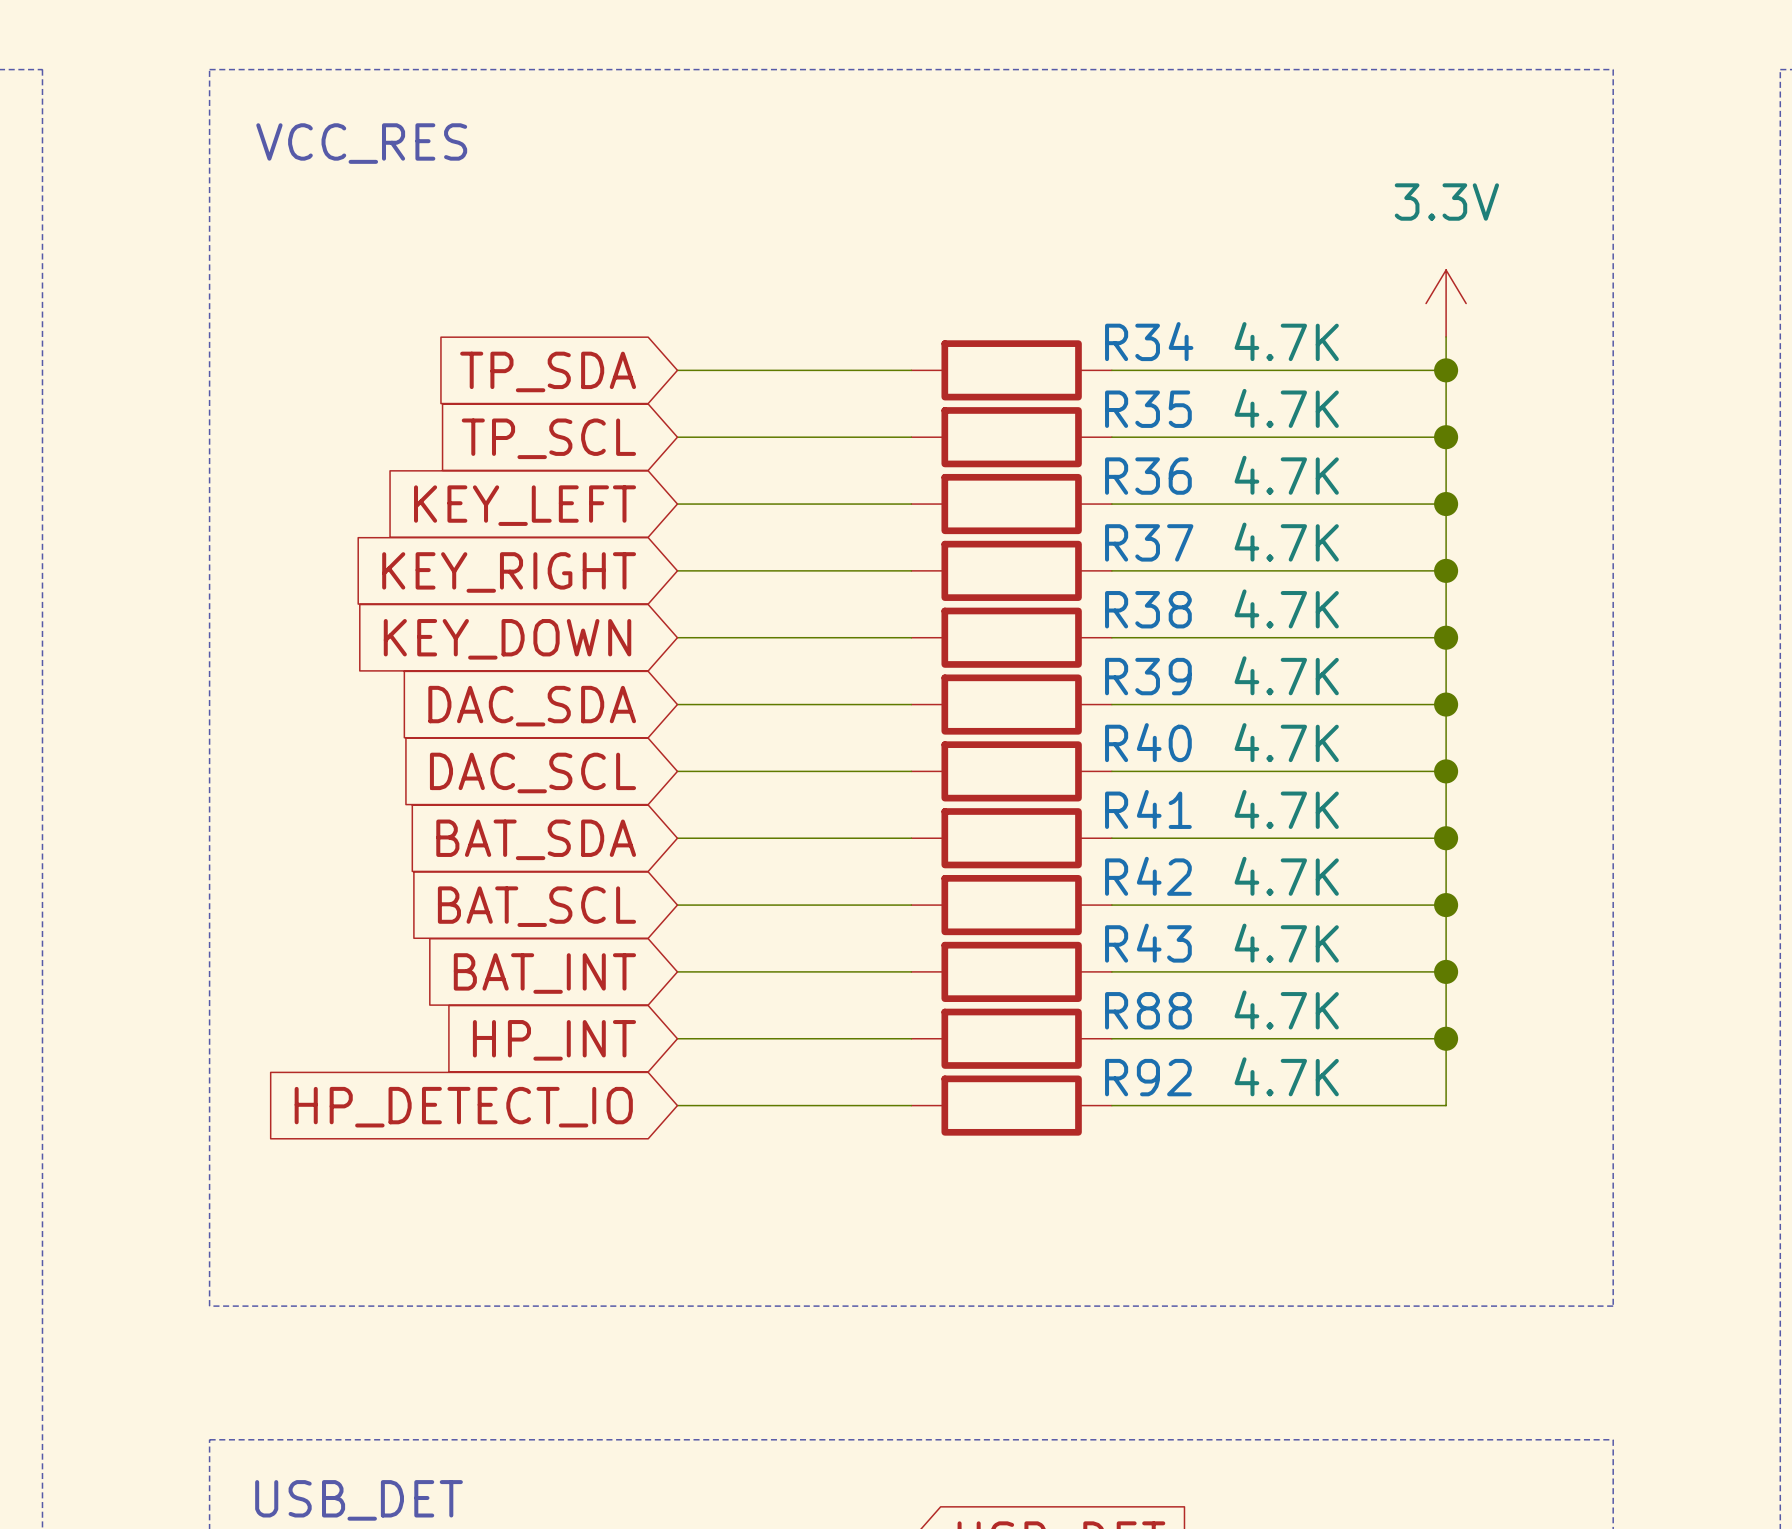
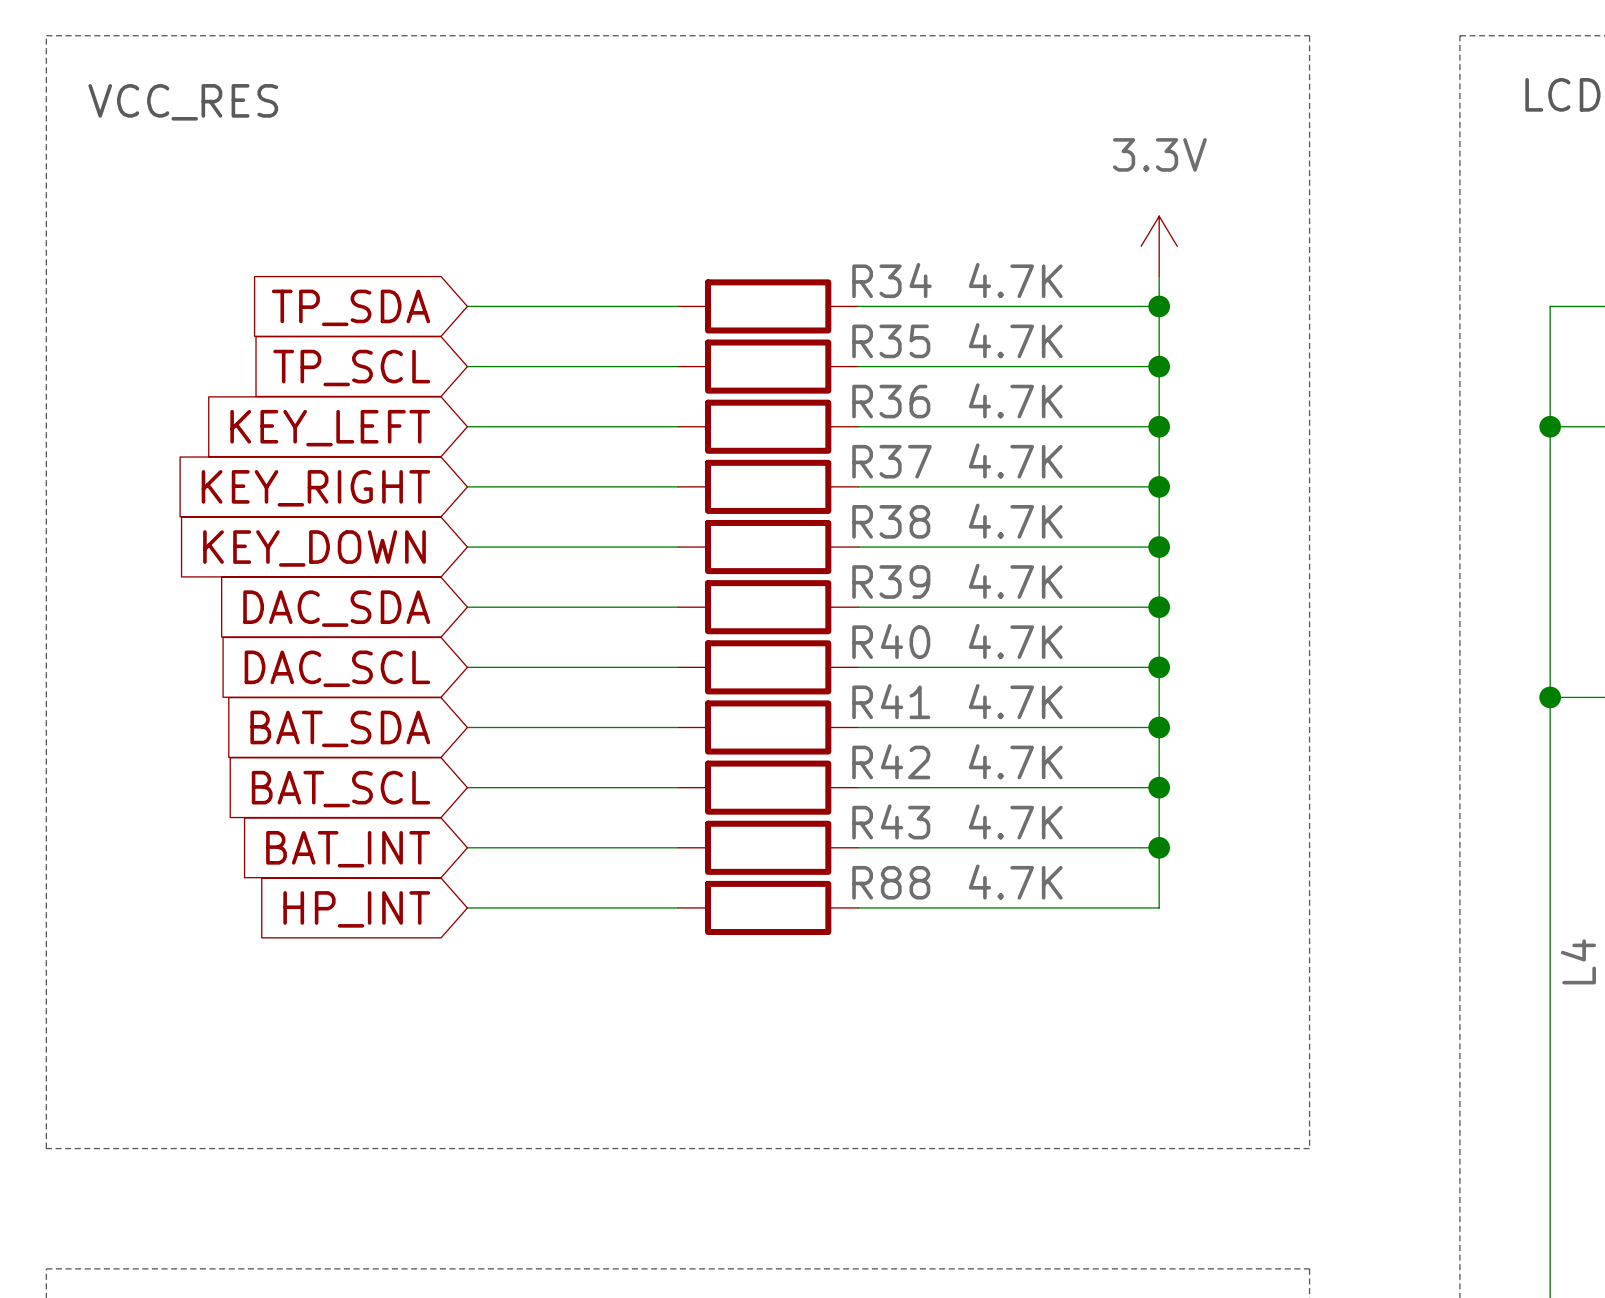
wire: (1446, 1038) (1446, 1105) (1111, 1105) -> none
junction: (1446, 1038) -> none
wire: (677, 1105) (911, 1105) -> none
R92: 4.7K (1011, 1105) -> none
global label: HP_DETECT_IO (463, 1107) -> none

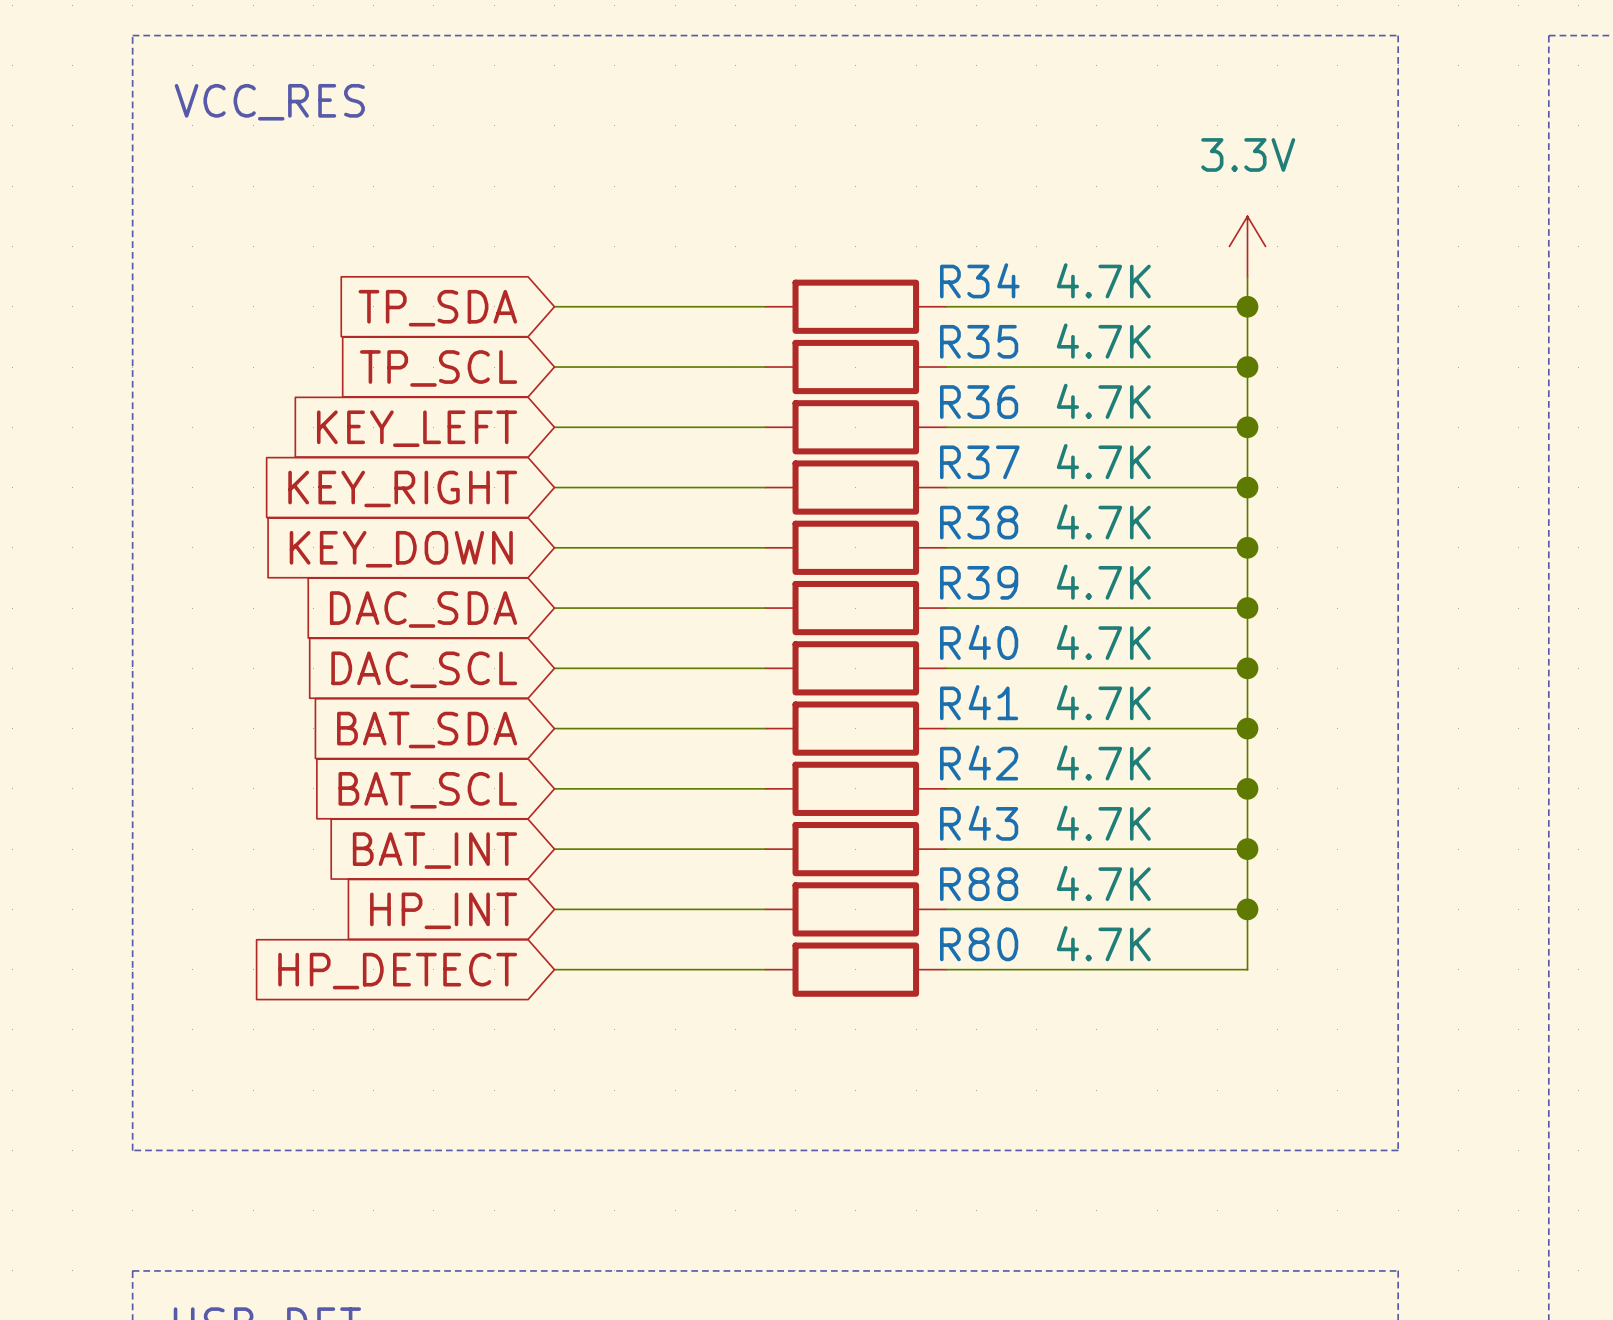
wire: none -> (1247, 909) (1247, 969) (946, 969)
junction: none -> (1247, 909)
wire: none -> (554, 969) (765, 969)
R80: none -> 4.7K (855, 969)
global label: none -> HP_DETECT (397, 971)

